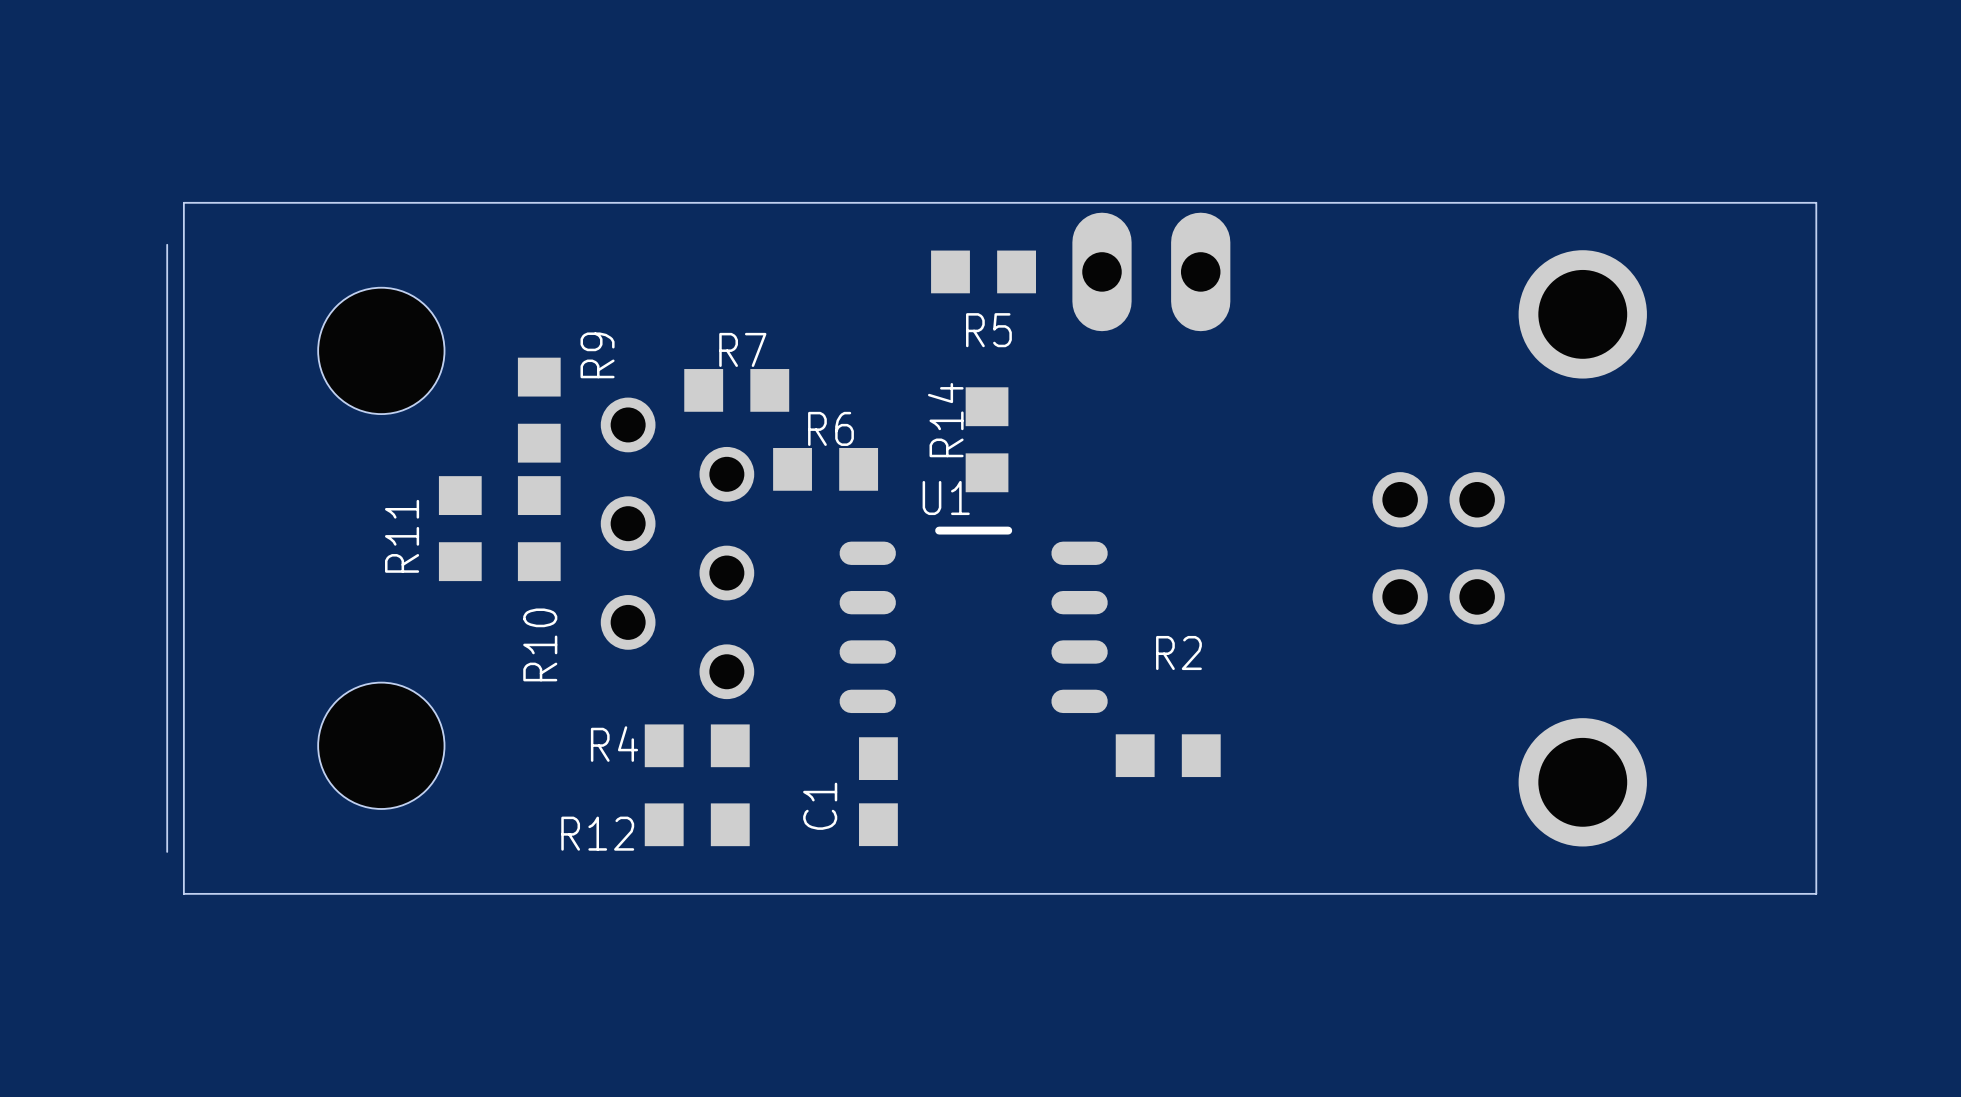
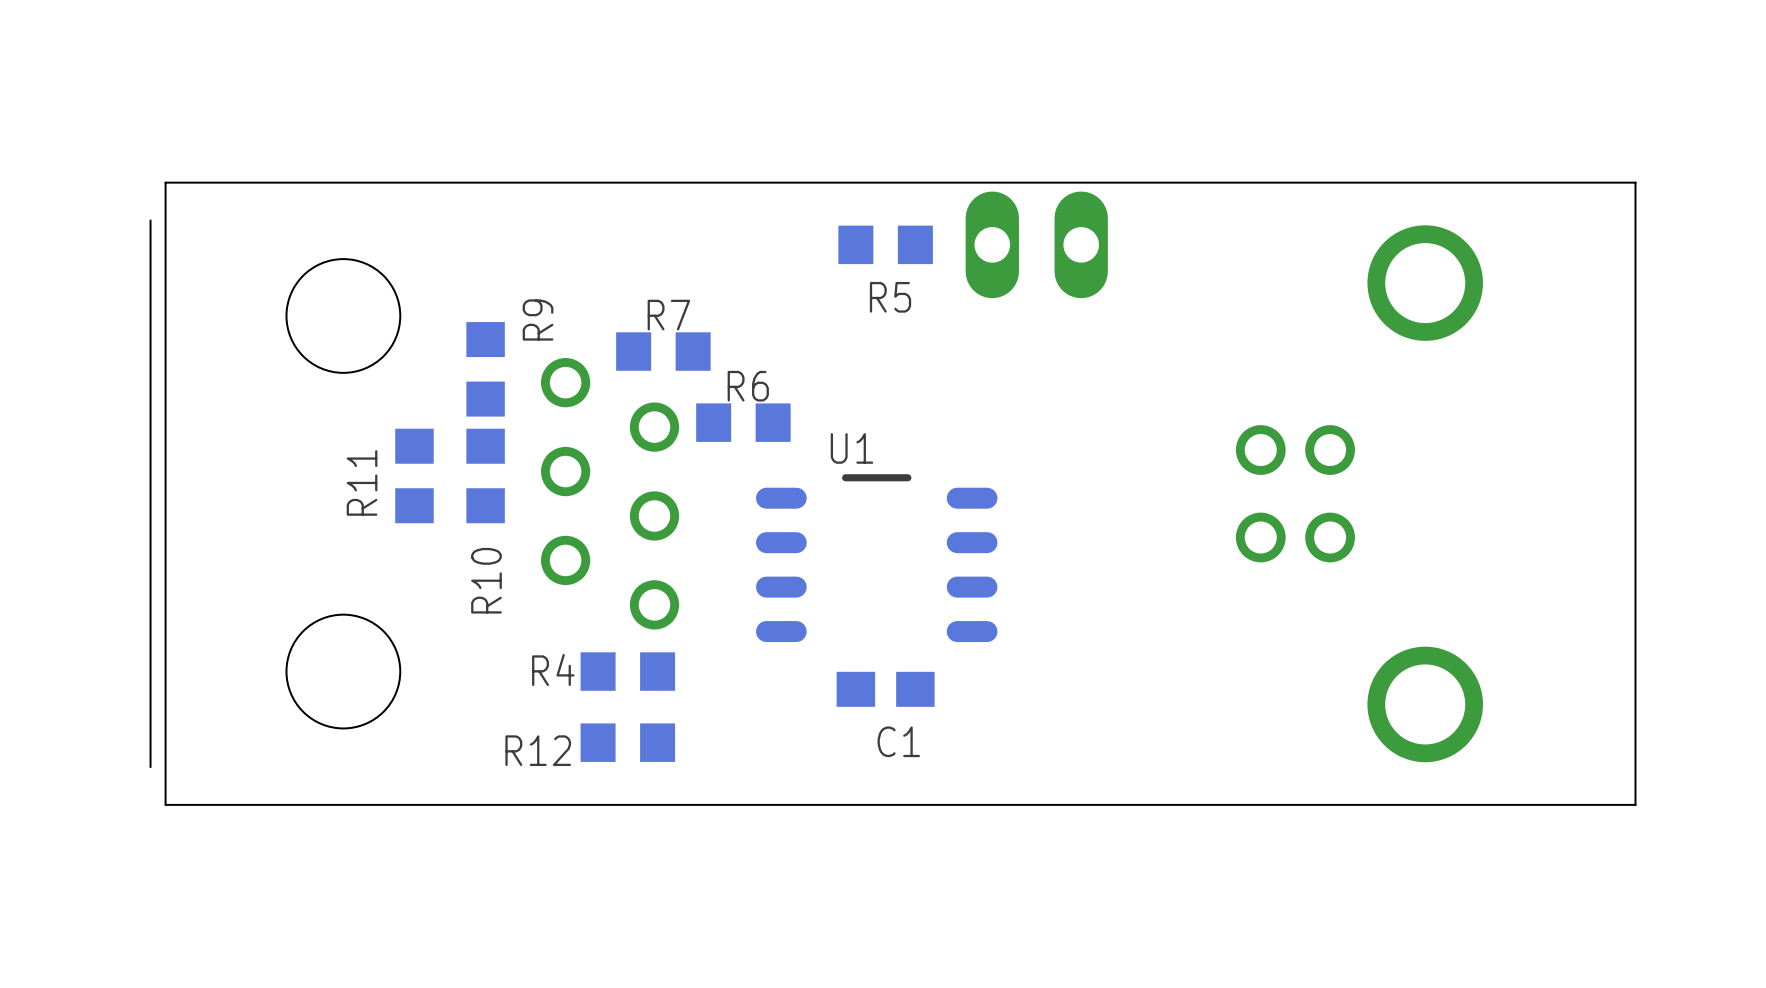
R14: (987, 439) -> none
R2: (1168, 755) -> none
C1 rotation: 0° (878, 791) -> 90° clockwise (885, 689)
C1 position: (878, 791) -> (885, 689)
C1 name position: C1 (820, 806) -> C1 (898, 741)

